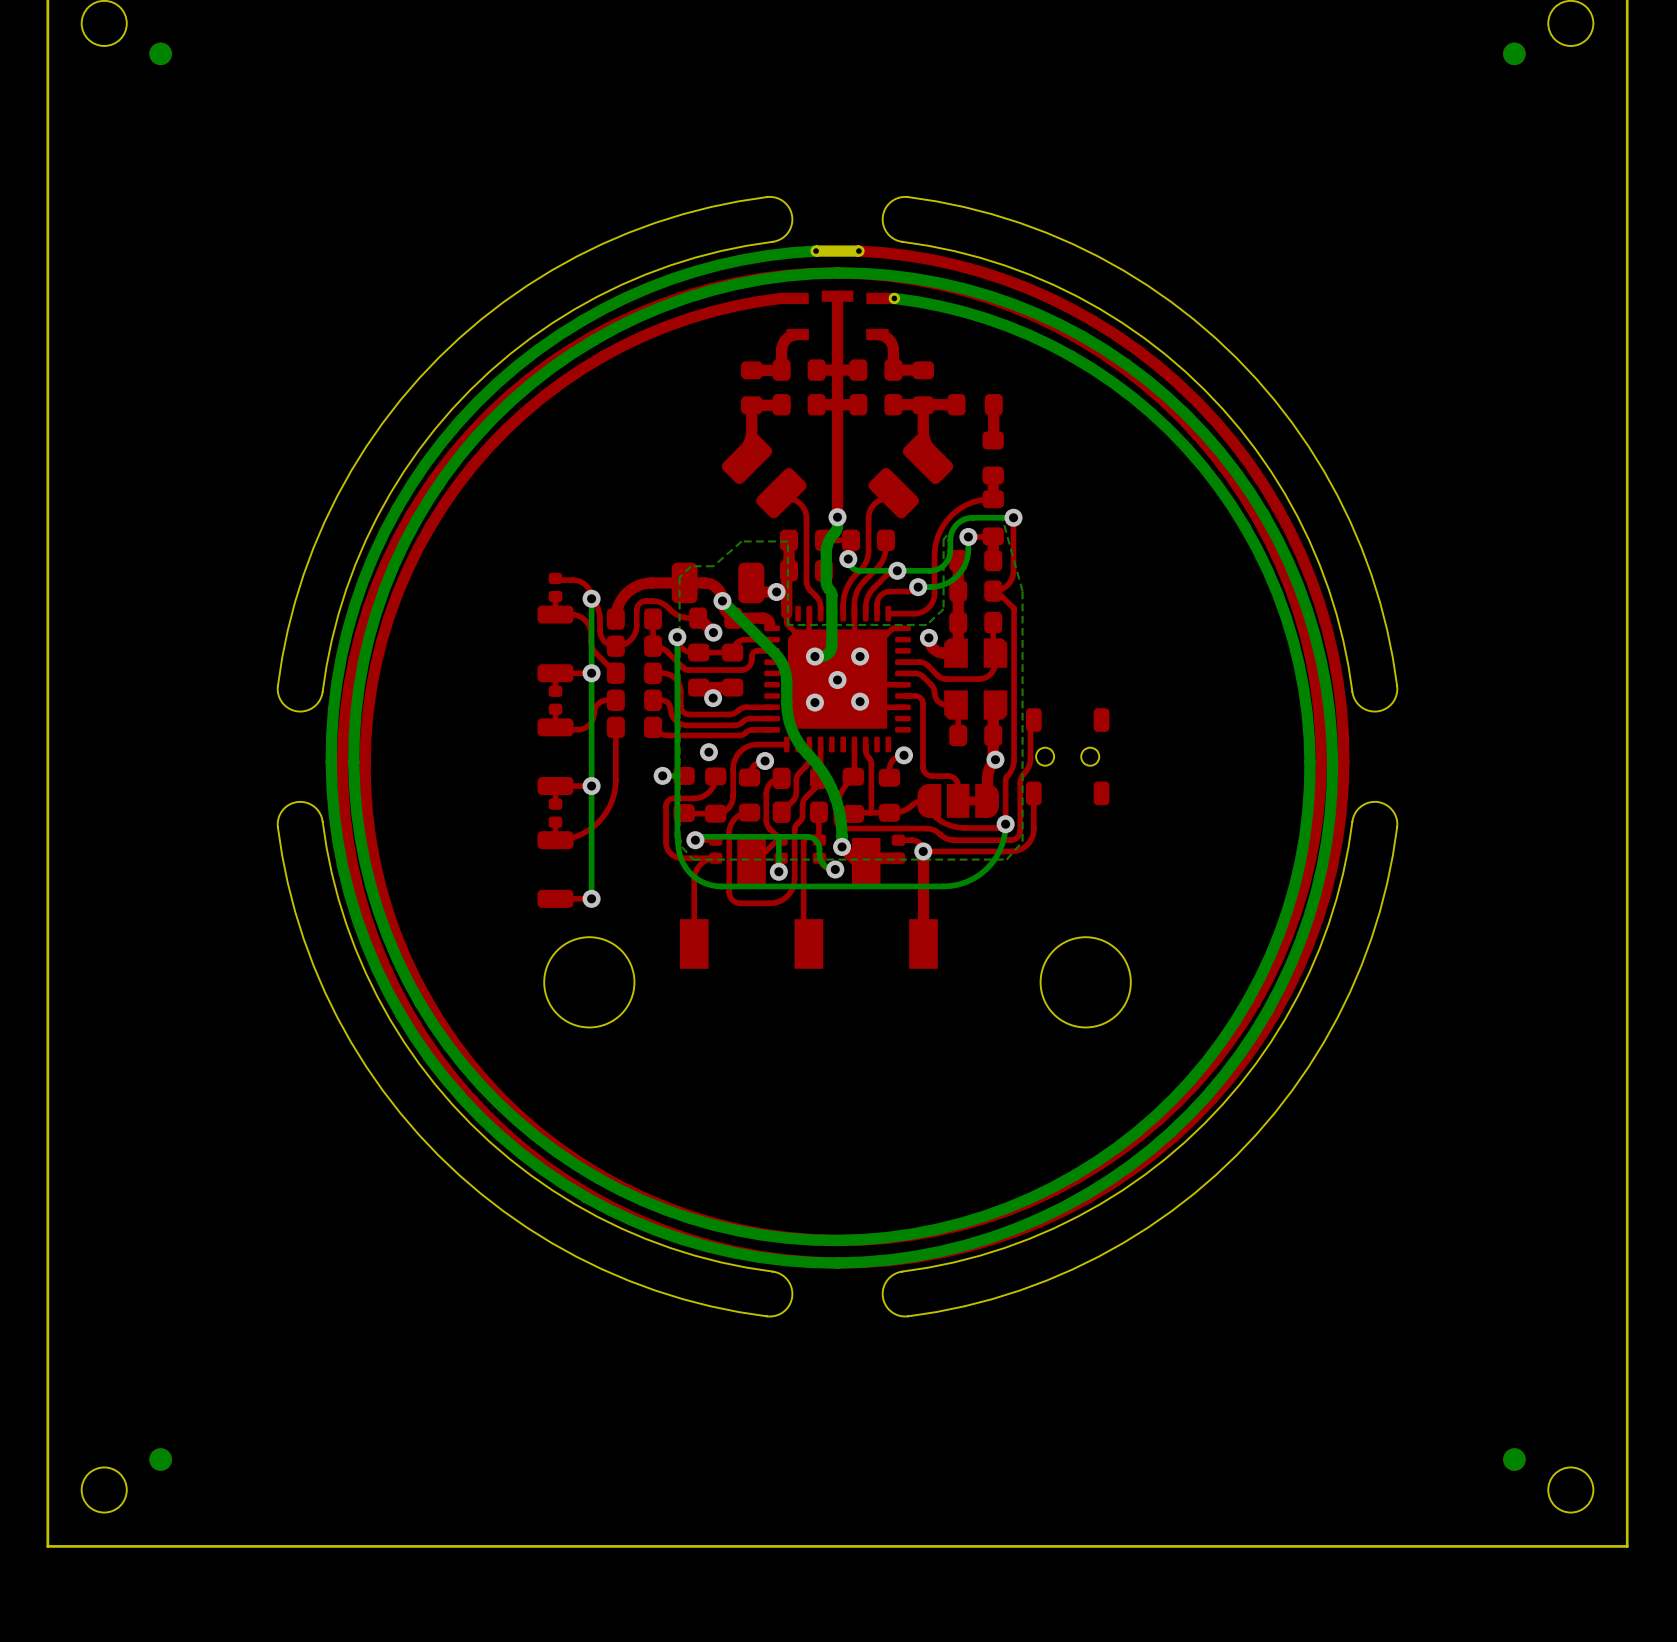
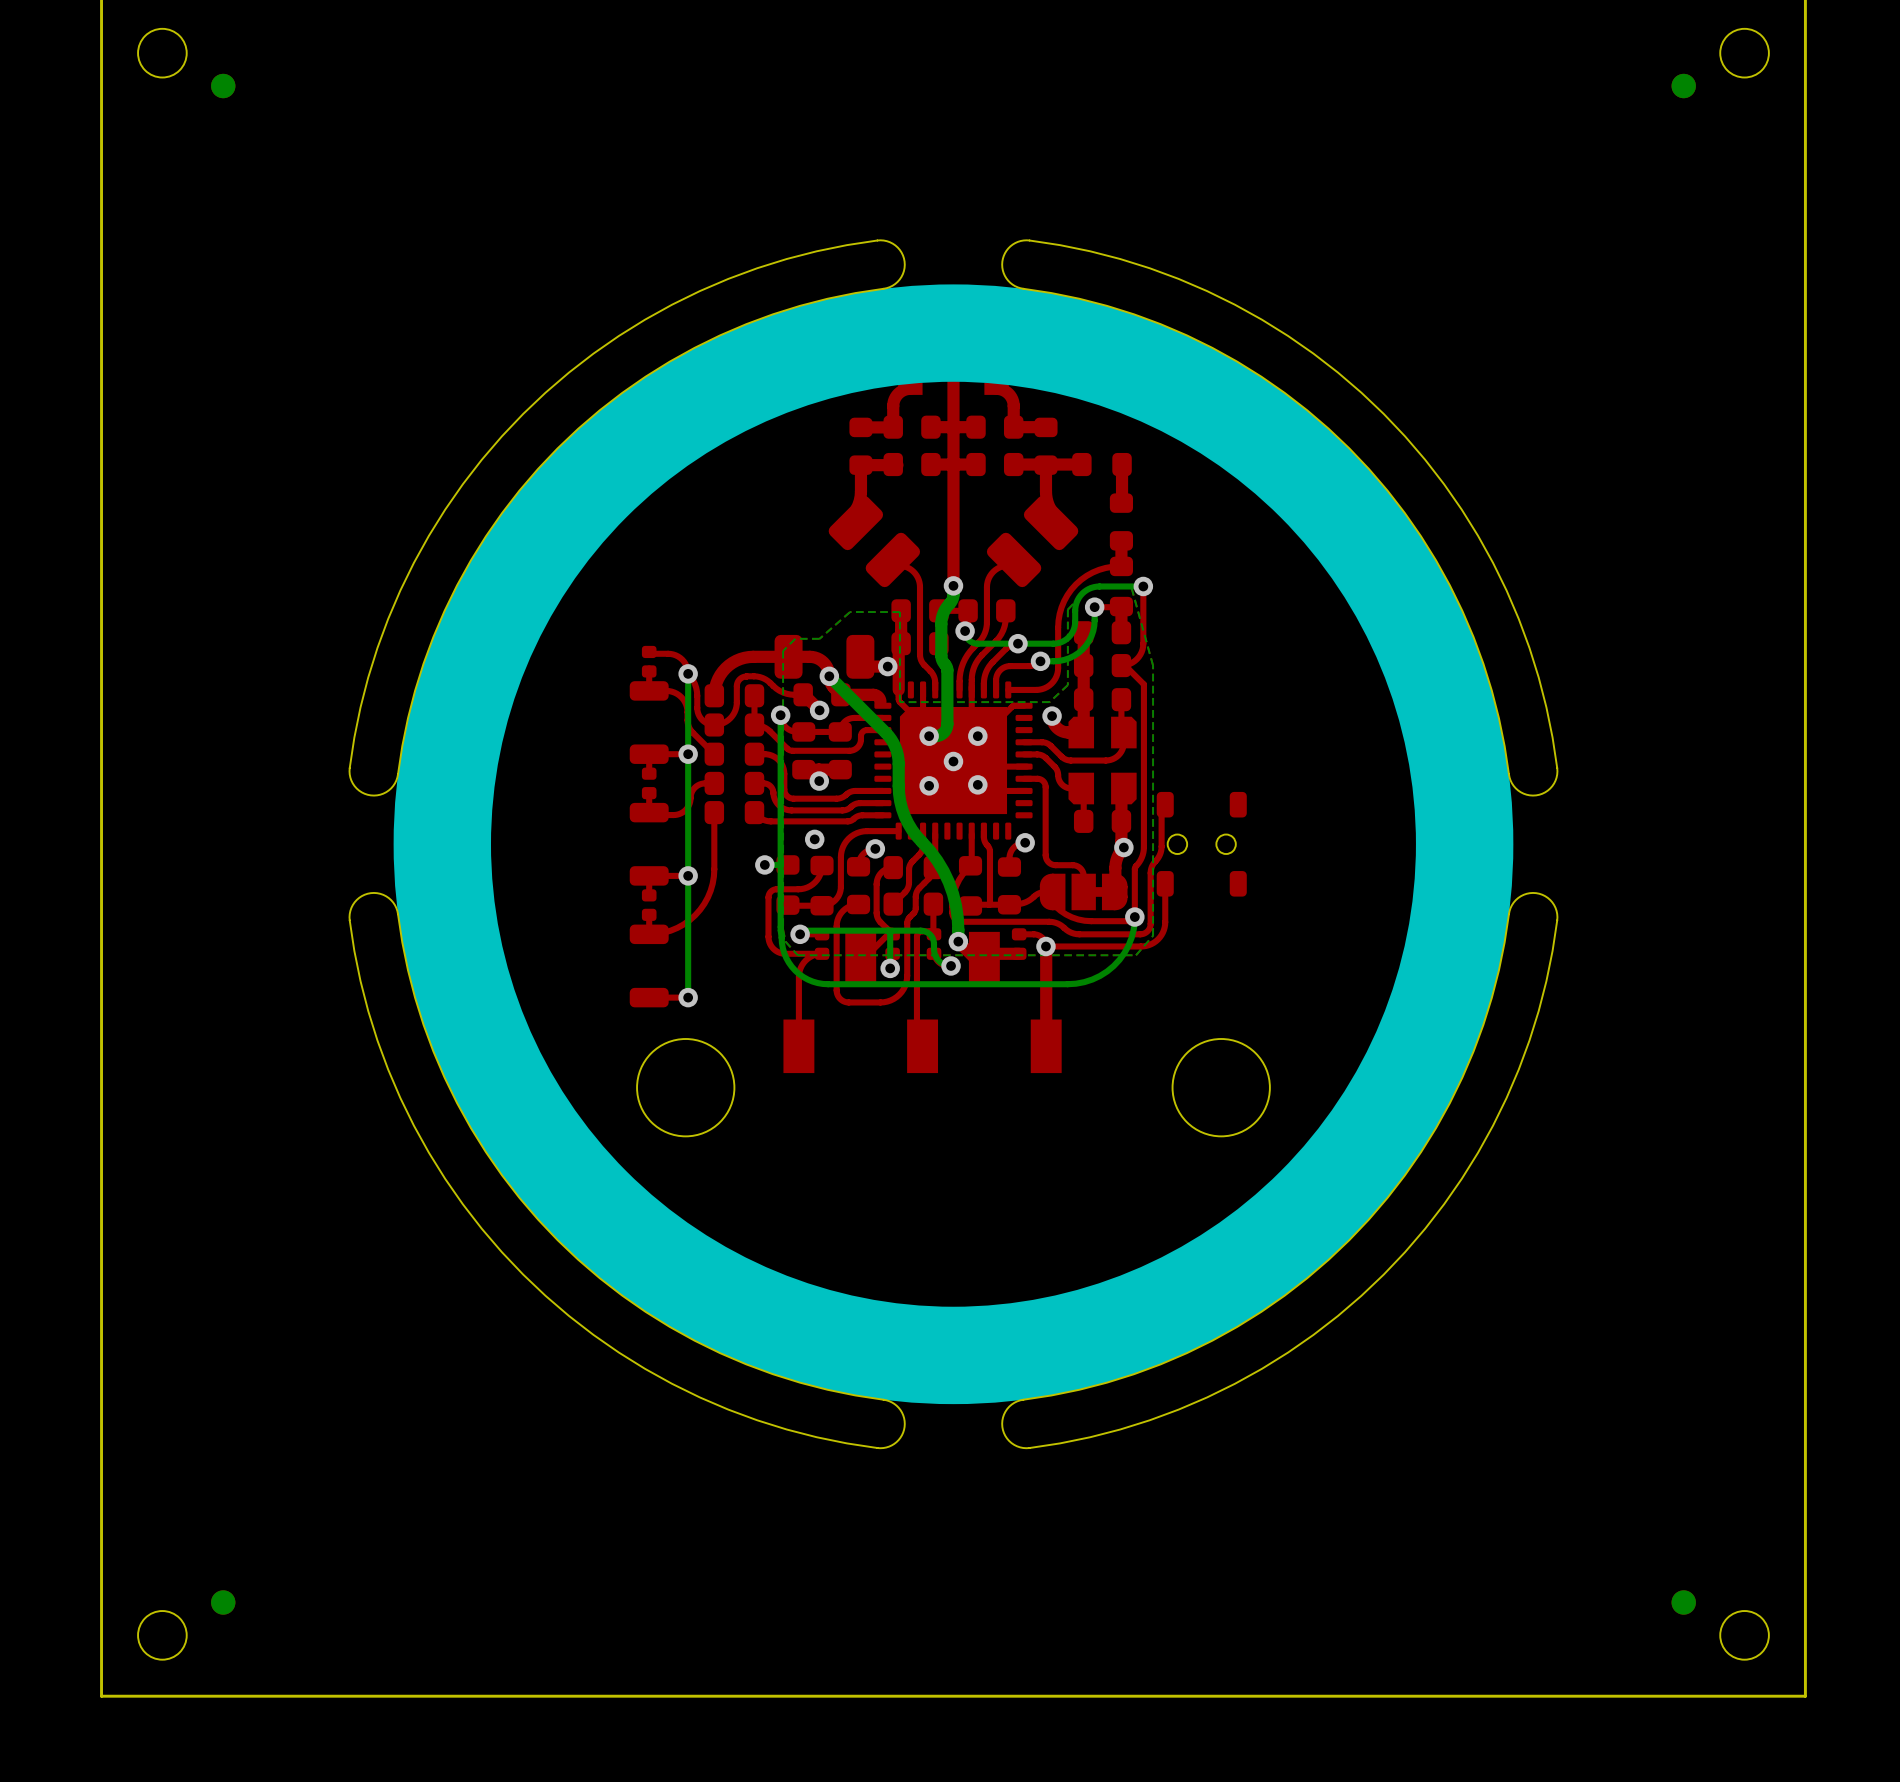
drawing: none -> [393, 284, 1514, 1405]

